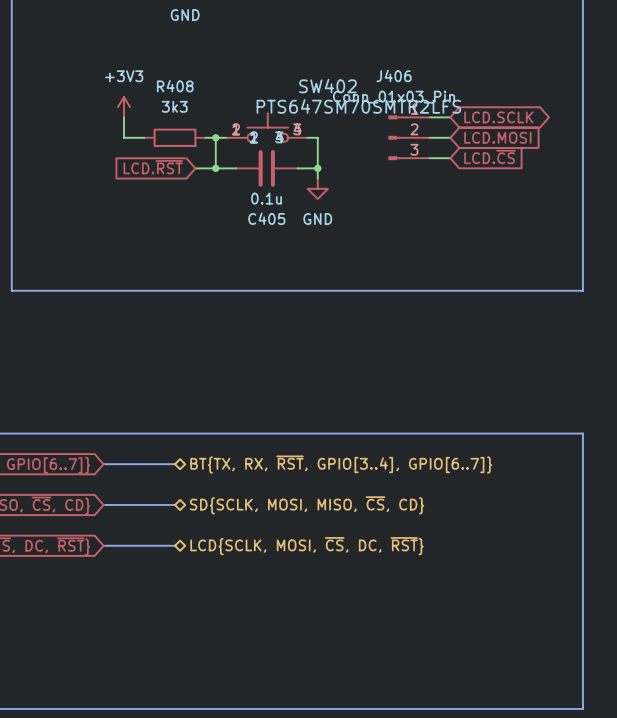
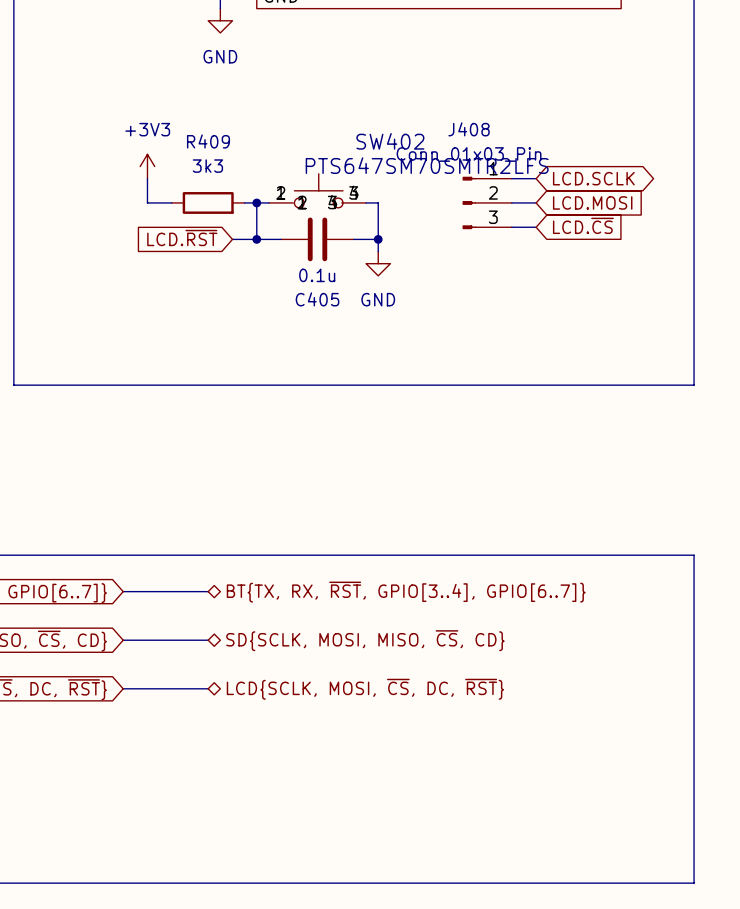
J406 name: J406 (394, 75) -> J408 (469, 129)
R408 name: R408 (175, 86) -> R409 (208, 141)

